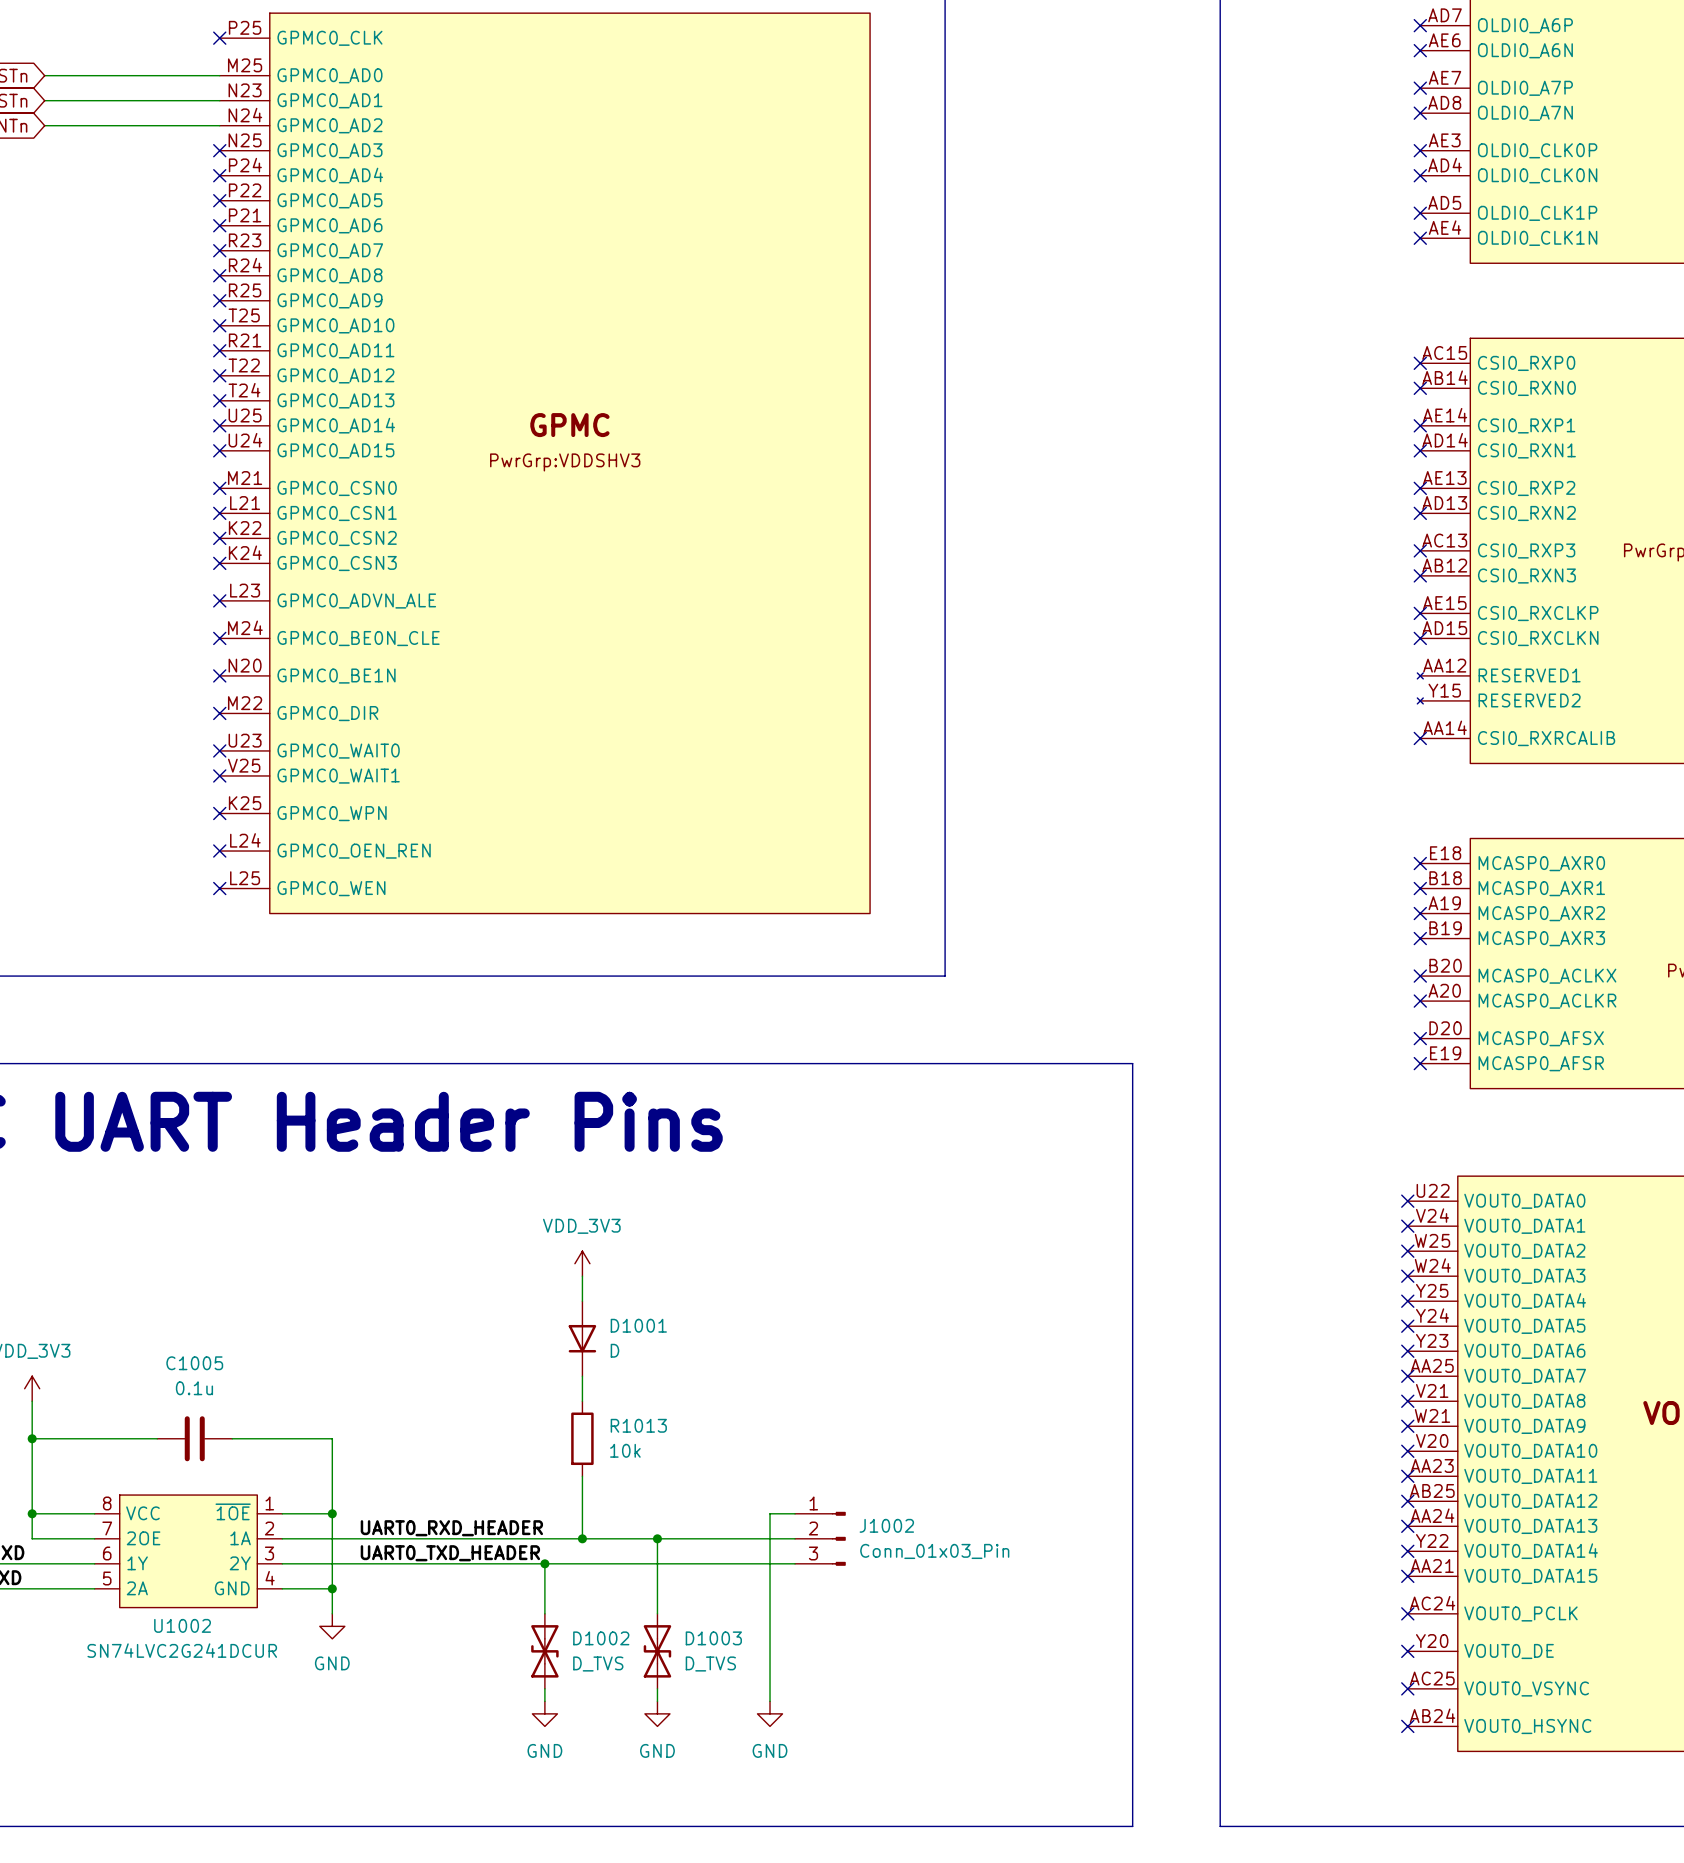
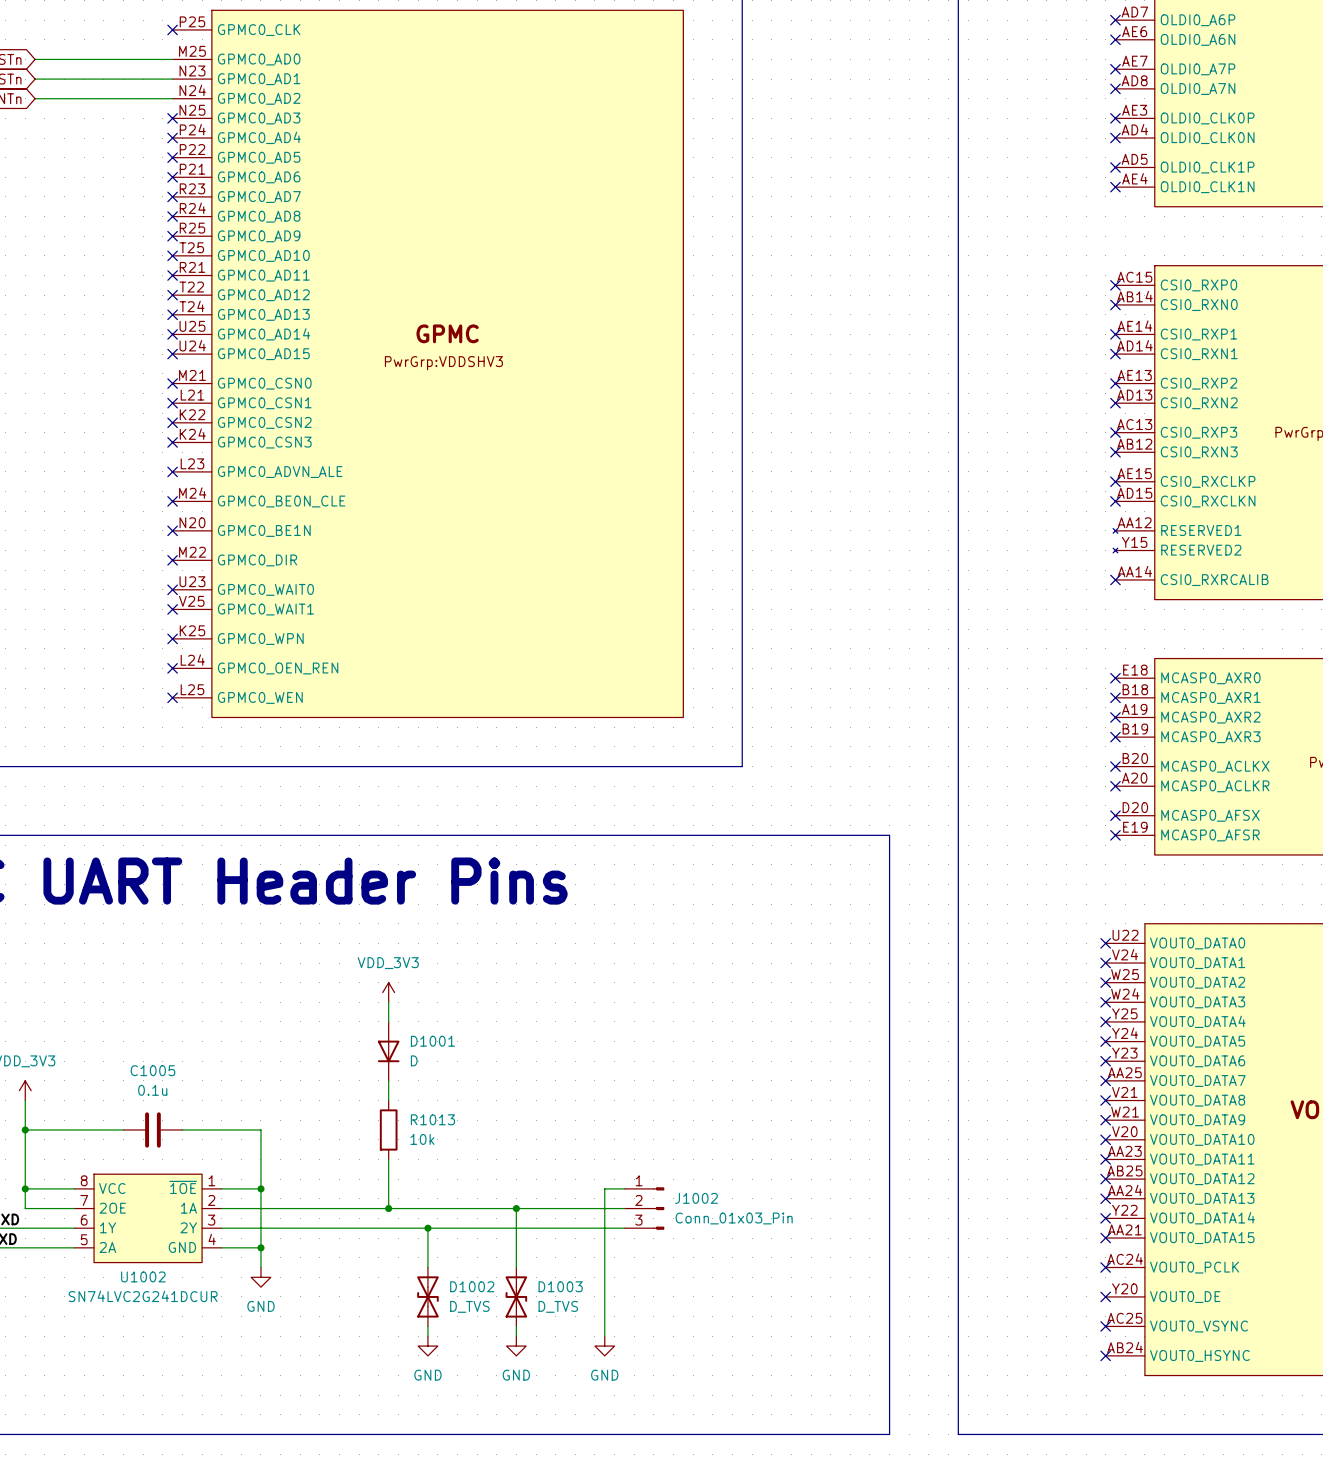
power symbol position: VDD_3V3 (582, 1263) -> VDD_3V3 (388, 992)
wire: (582, 1276) (582, 1301) -> (388, 1002) (388, 1021)
D1001 position: (582, 1338) -> (388, 1051)
wire: (582, 1376) (582, 1401) -> (388, 1080) (388, 1100)
R1013 position: (582, 1438) -> (388, 1129)
wire: (582, 1476) (582, 1538) -> (388, 1159) (388, 1208)
label: UART0_RXD_HEADER (451, 1528) -> none
junction: none -> (388, 1208)
junction: (582, 1538) -> none
label: UART0_TXD_HEADER (450, 1553) -> none

